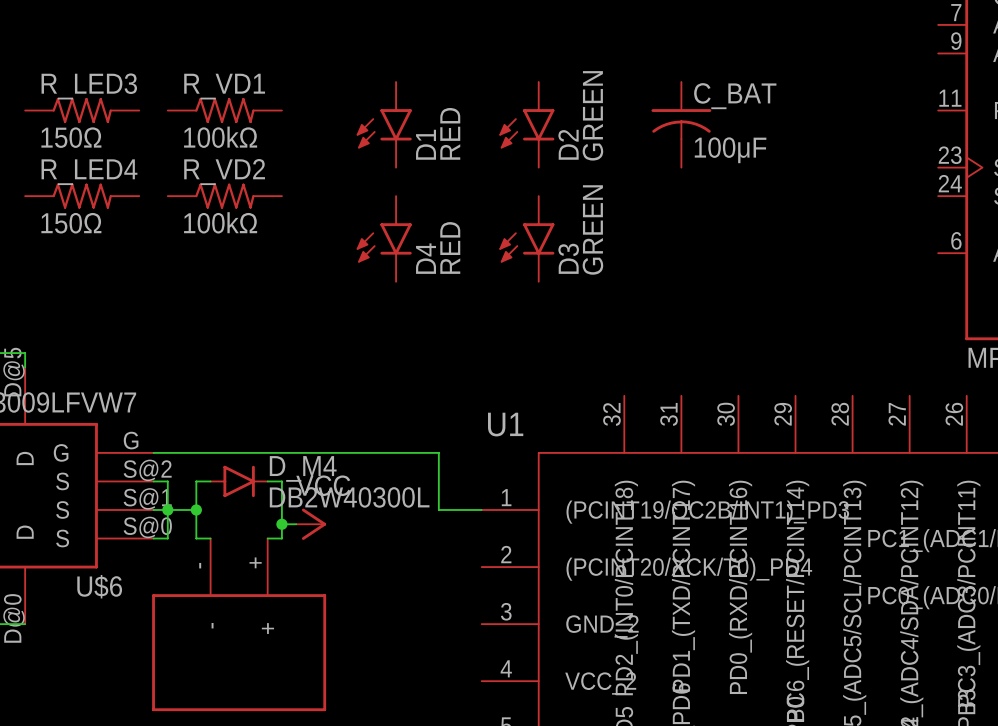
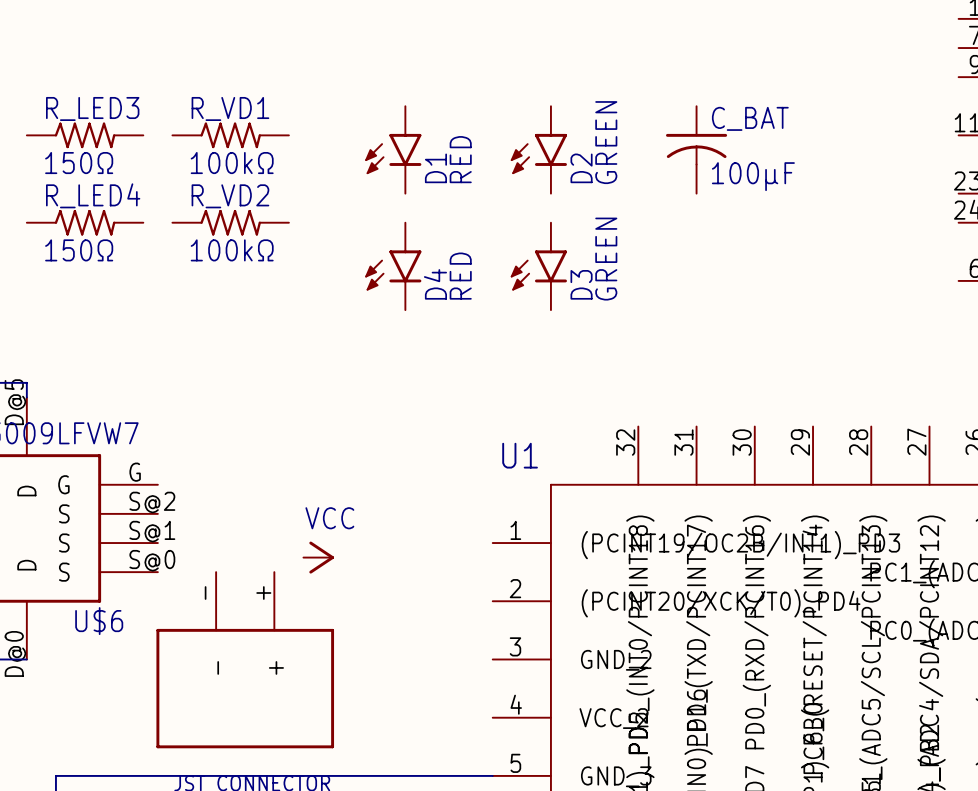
wire: (153, 452) (438, 452) (438, 509) (481, 509) -> none
wire: (153, 481) (167, 481) (167, 538) (153, 538) -> none
wire: (210, 481) (196, 481) (196, 538) (210, 538) -> none
D_M4: DB2W40300L (239, 481) -> none
wire: (267, 481) (281, 481) (281, 538) (267, 538) -> none
wire: (153, 509) (196, 509) -> none
junction: (167, 509) -> none
junction: (196, 509) -> none
wire: (281, 524) (296, 524) -> none
junction: (281, 524) -> none

